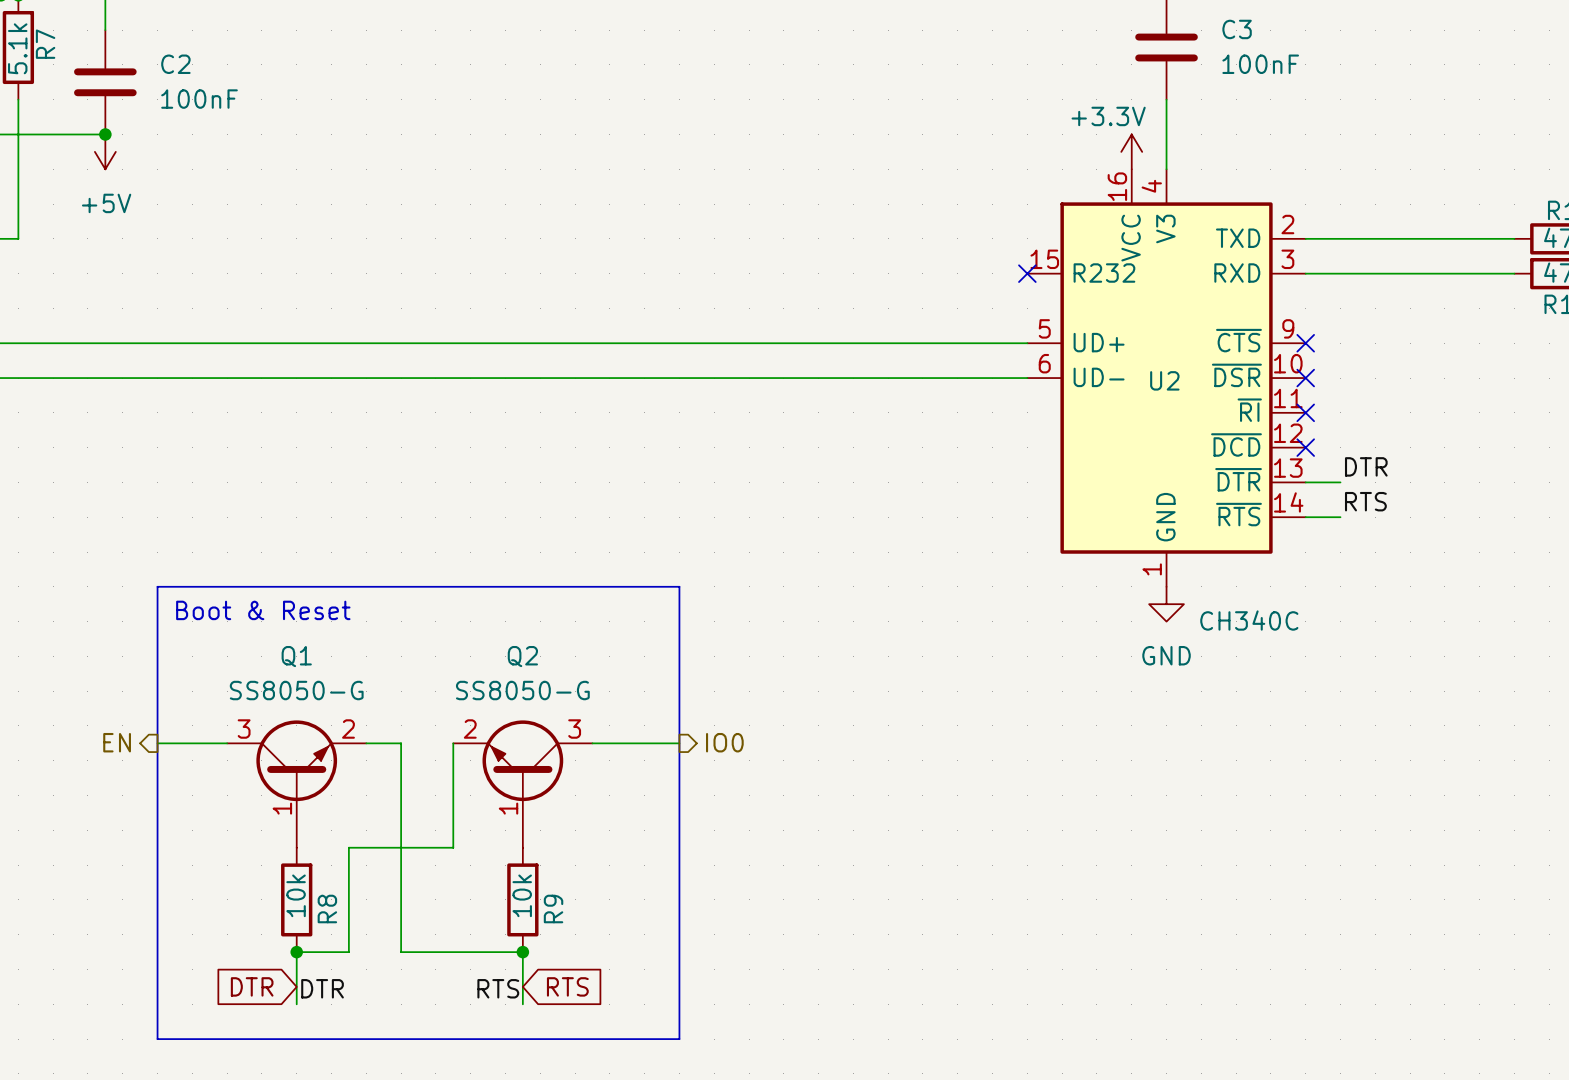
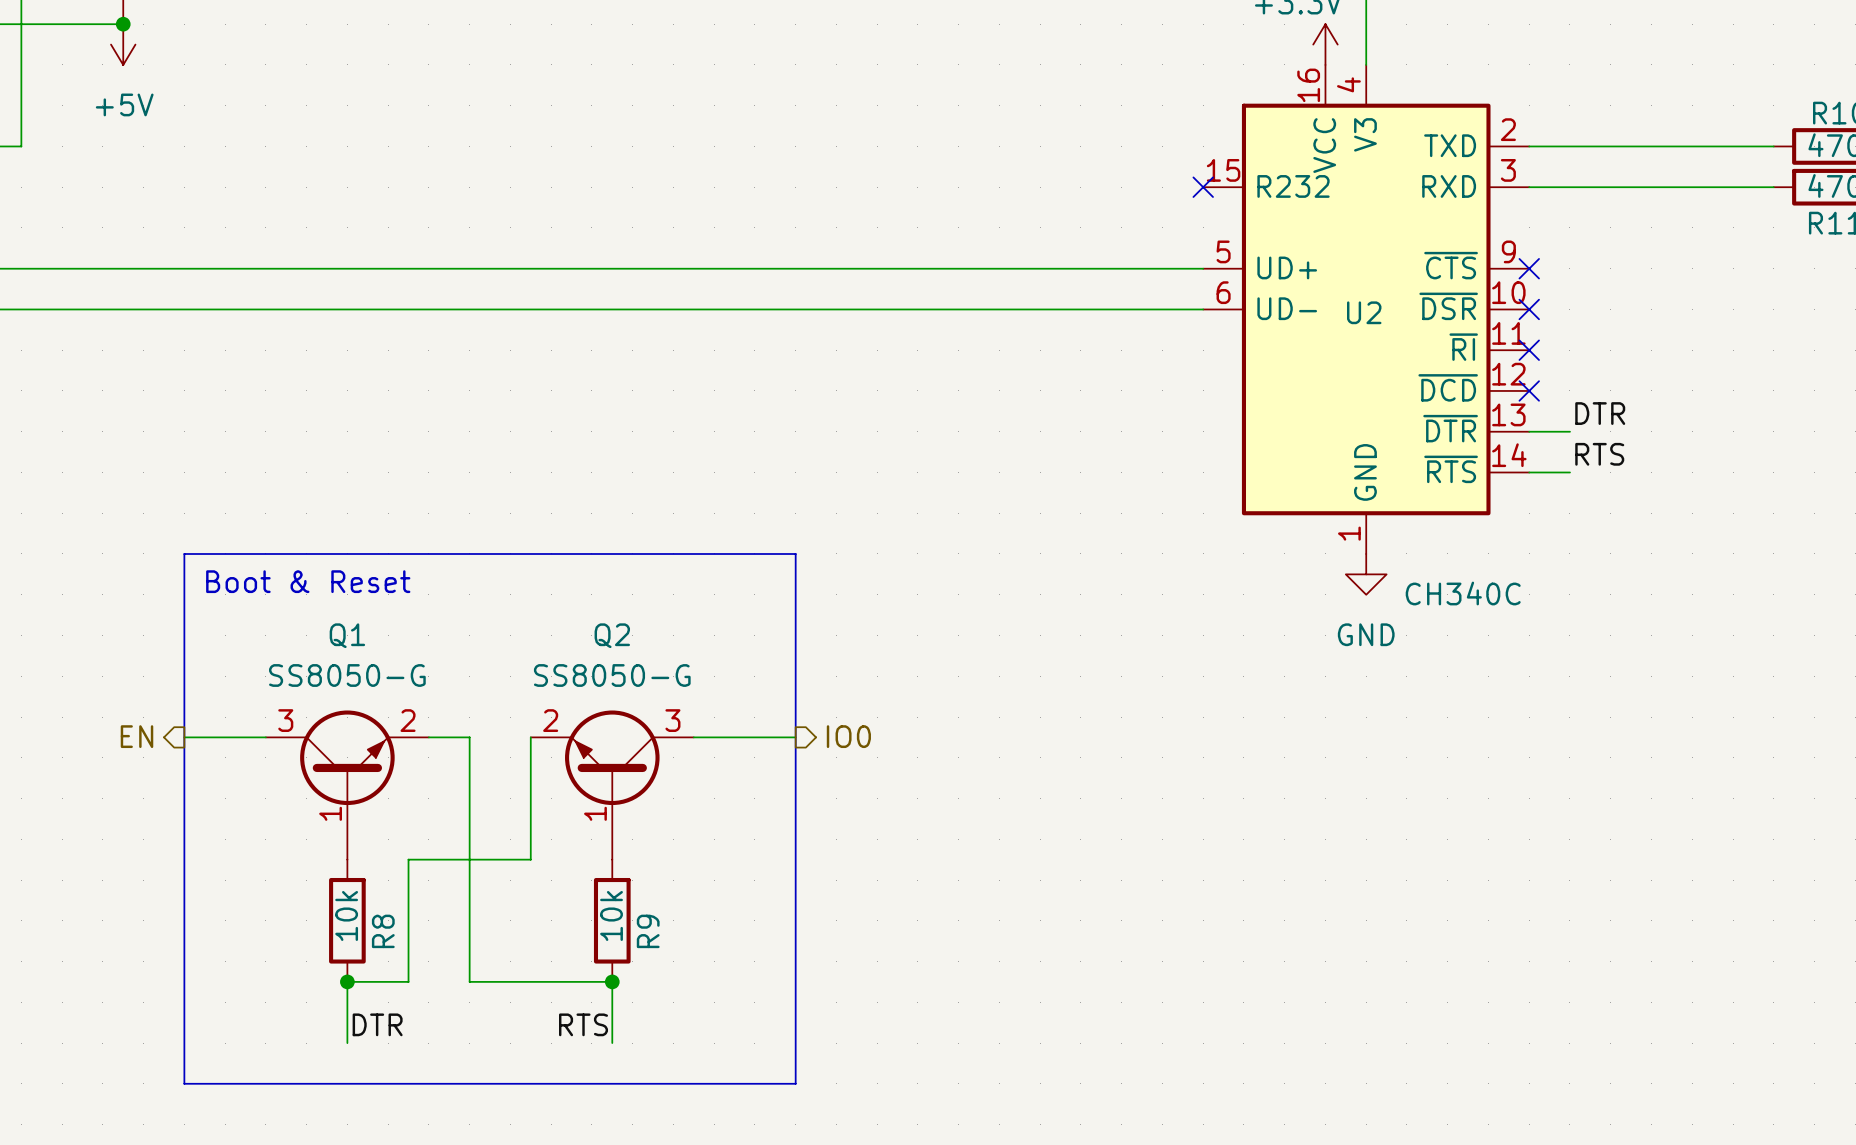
global label: DTR (252, 986) -> none
global label: RTS (567, 986) -> none

